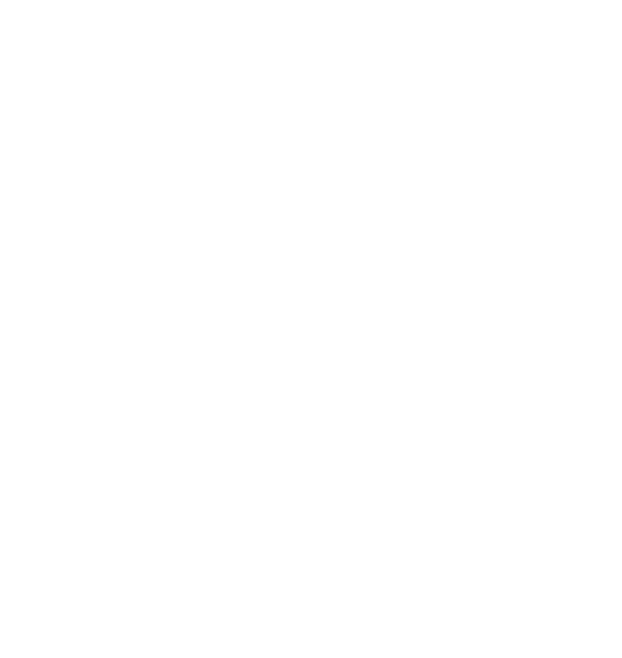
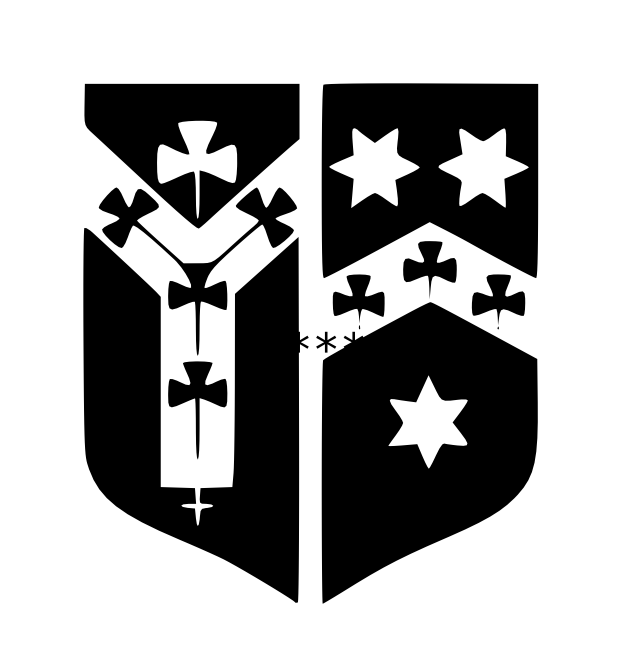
part: none -> (310, 343)

